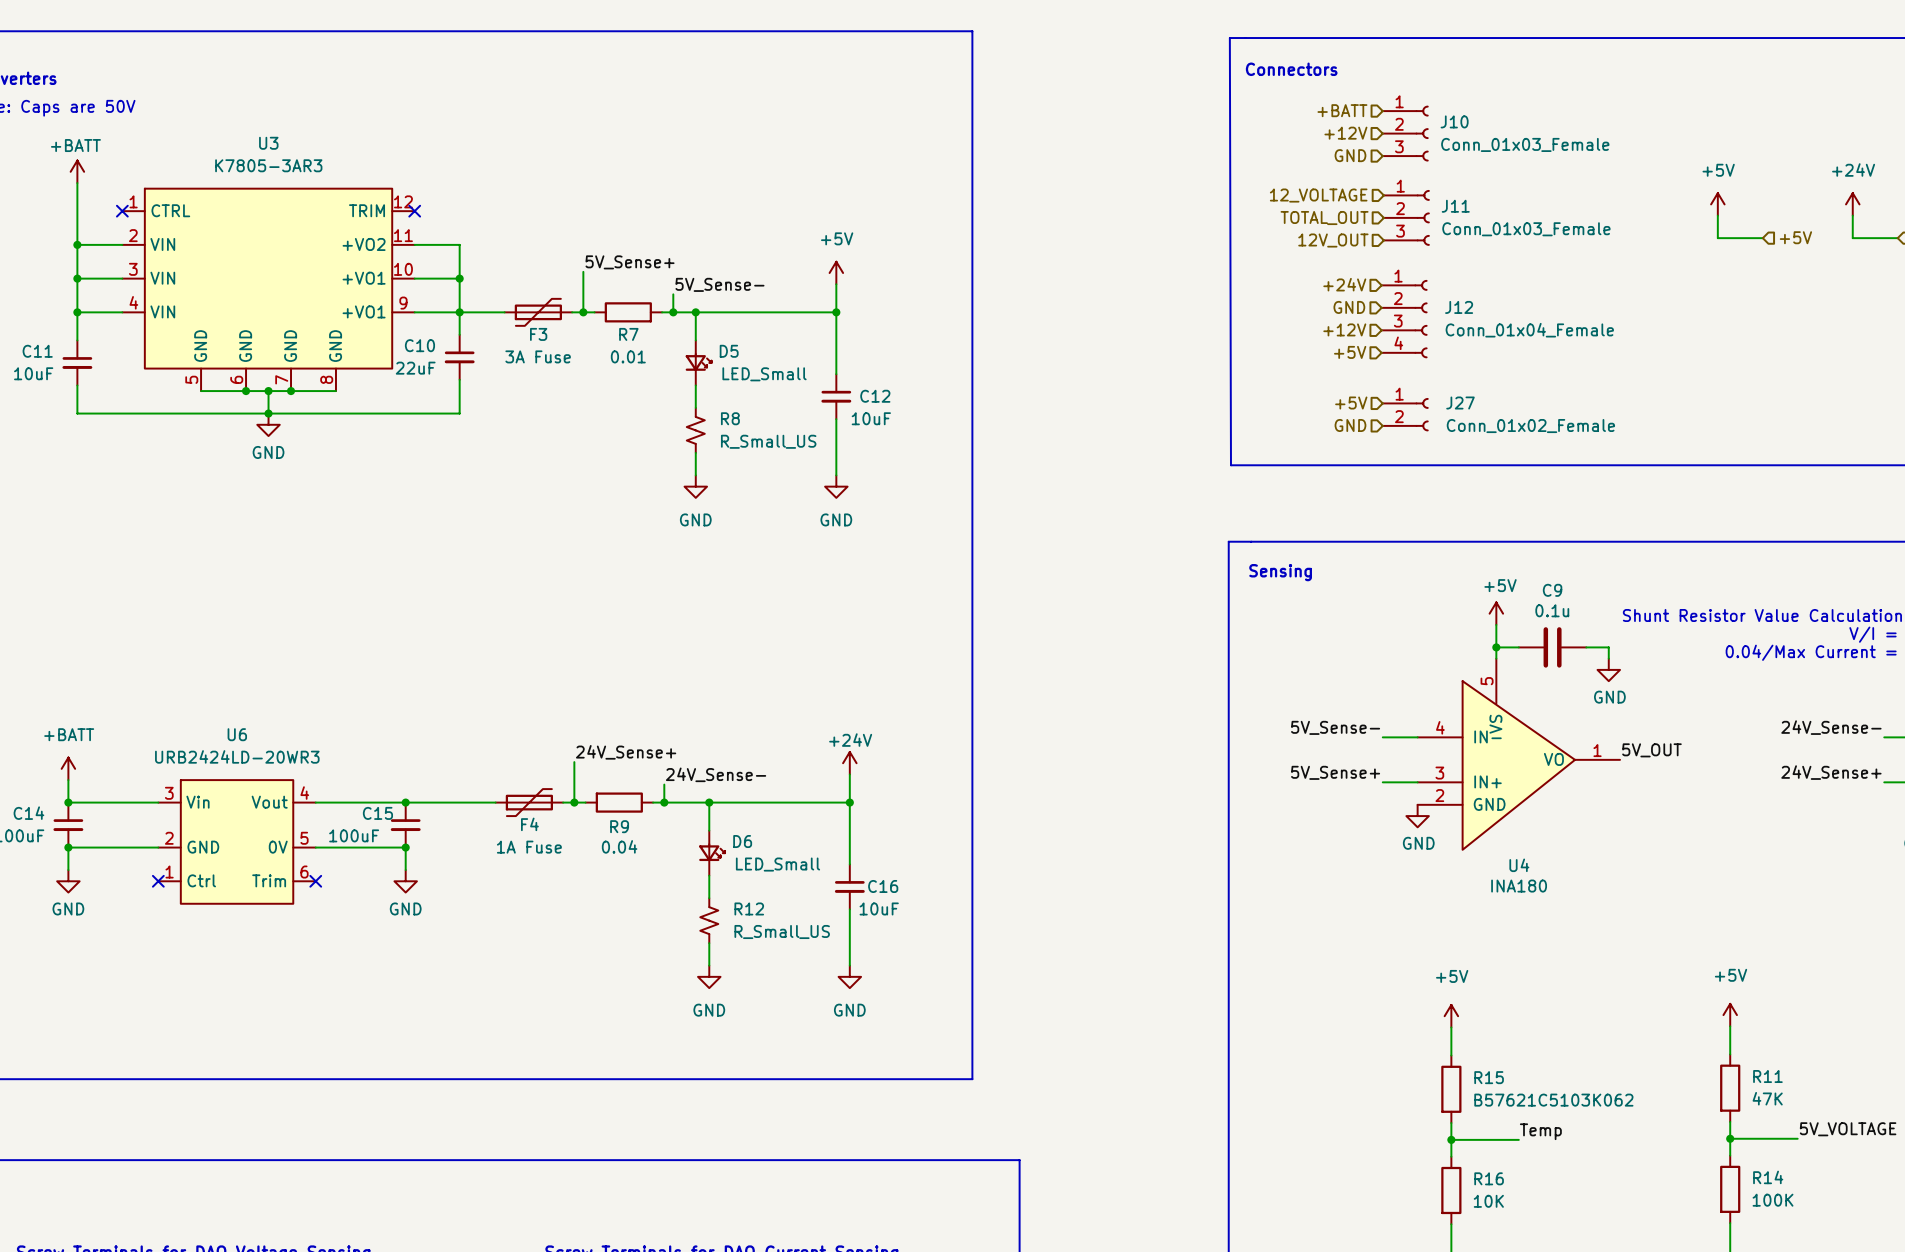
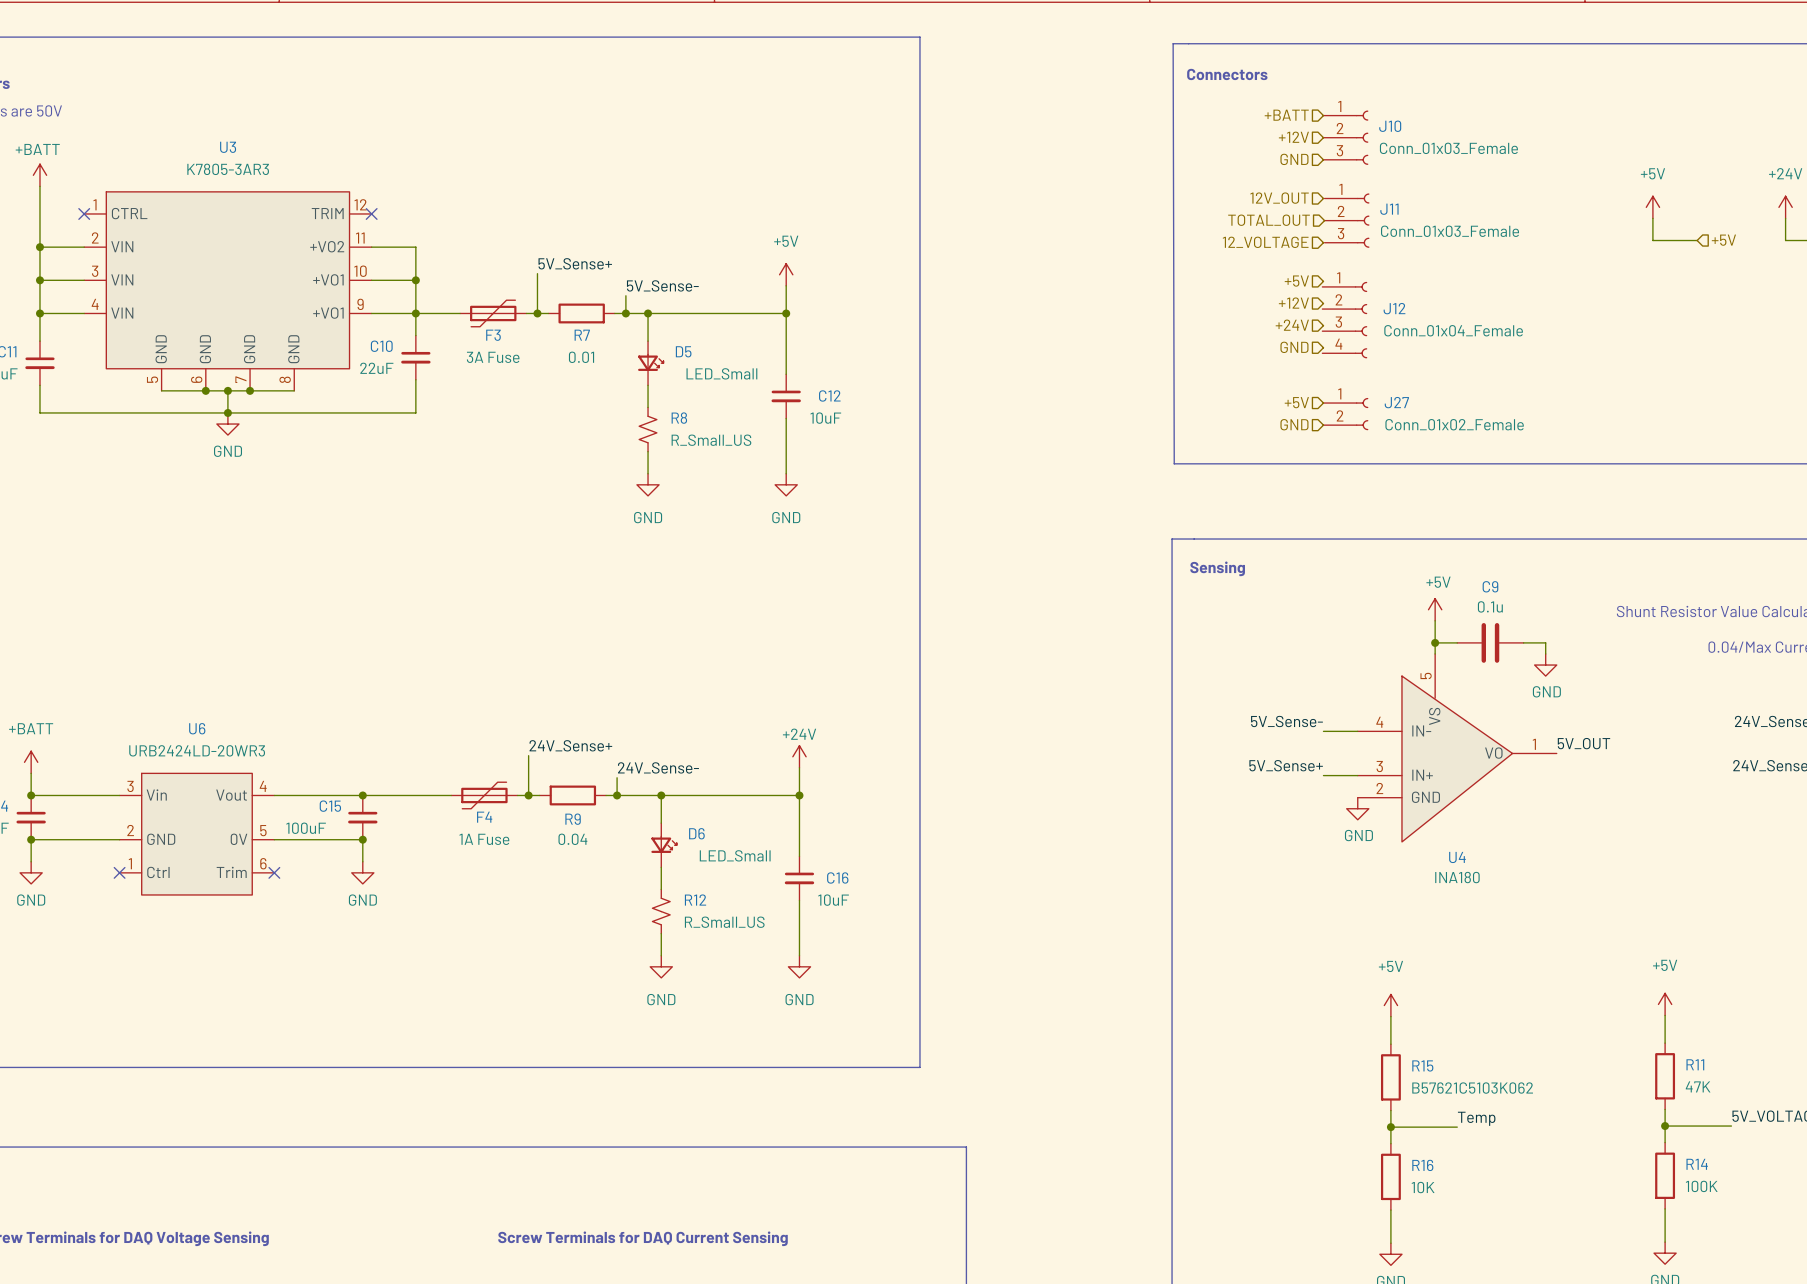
hierarchical label: 12_VOLTAGE (1318, 195) -> 12V_OUT (1279, 198)
hierarchical label: 12V_OUT (1333, 240) -> 12_VOLTAGE (1265, 242)
hierarchical label: +24V (1344, 284) -> +5V (1296, 281)
hierarchical label: GND (1349, 307) -> +12V (1293, 303)
hierarchical label: +12V (1344, 329) -> +24V (1292, 325)
hierarchical label: +5V (1350, 352) -> GND (1294, 347)

